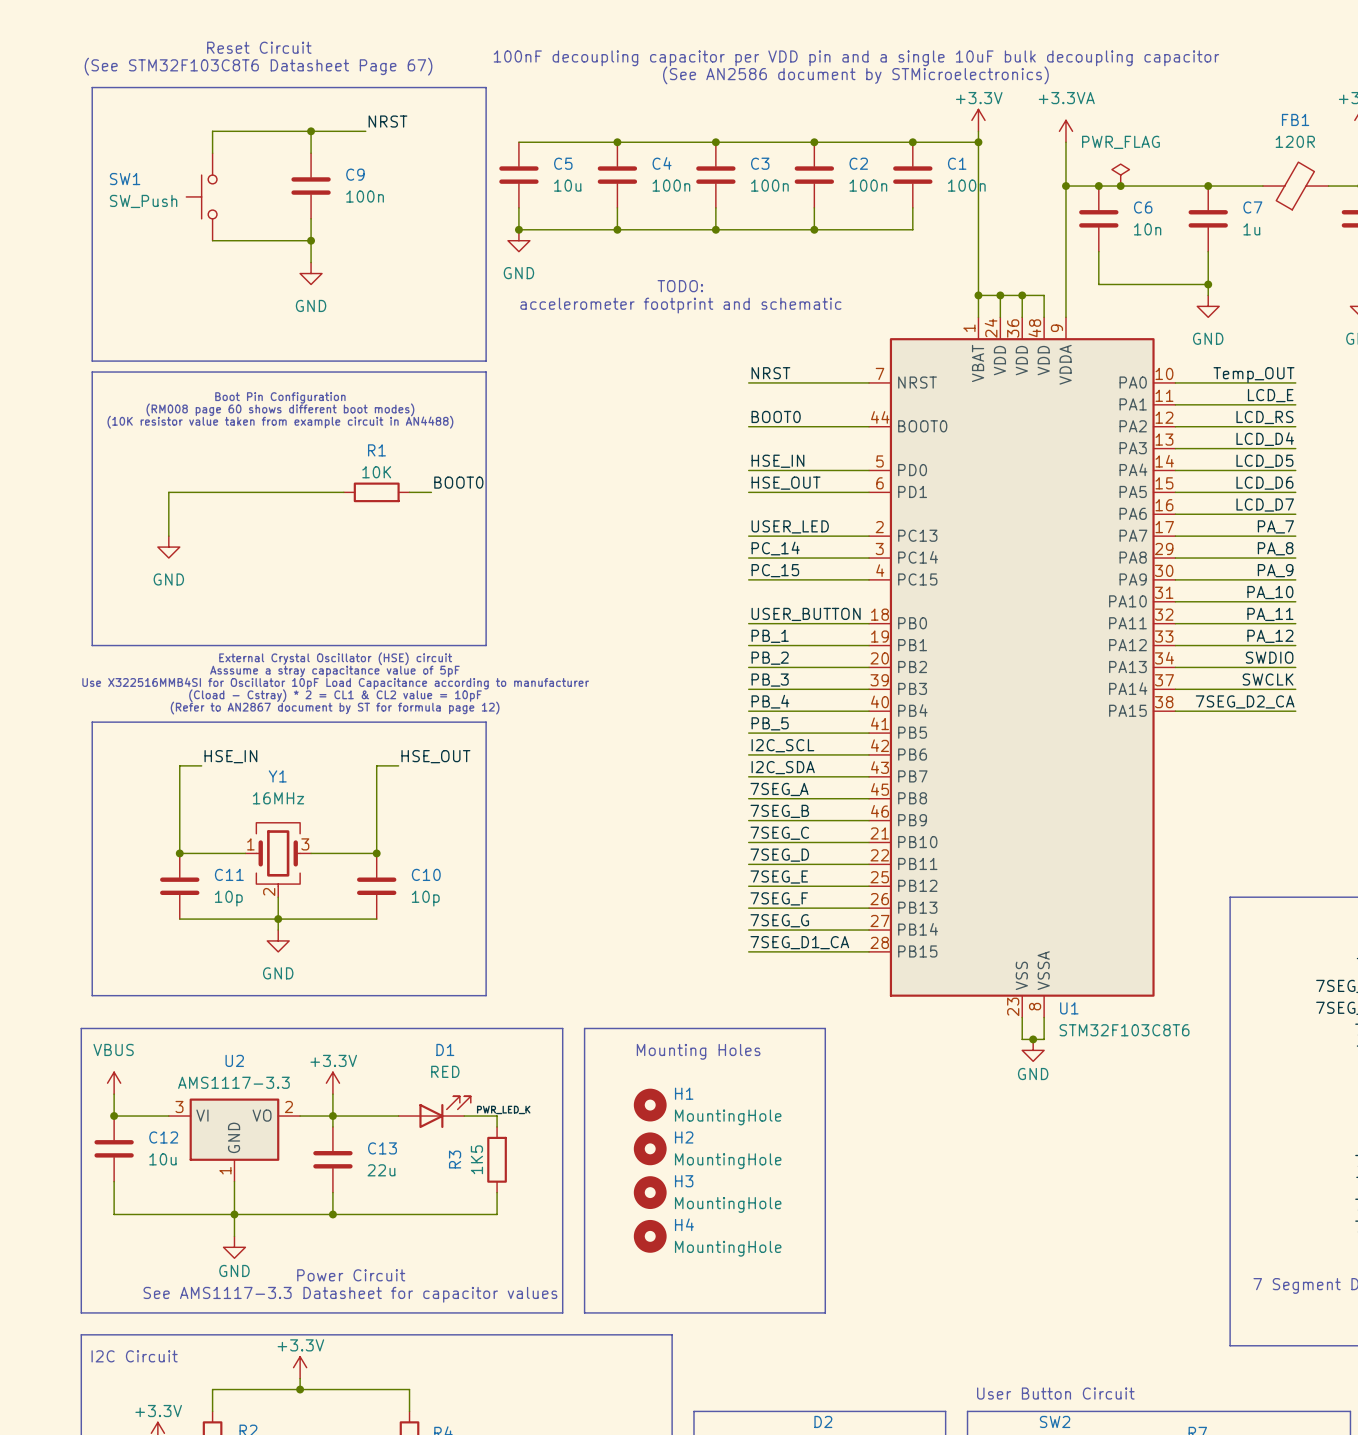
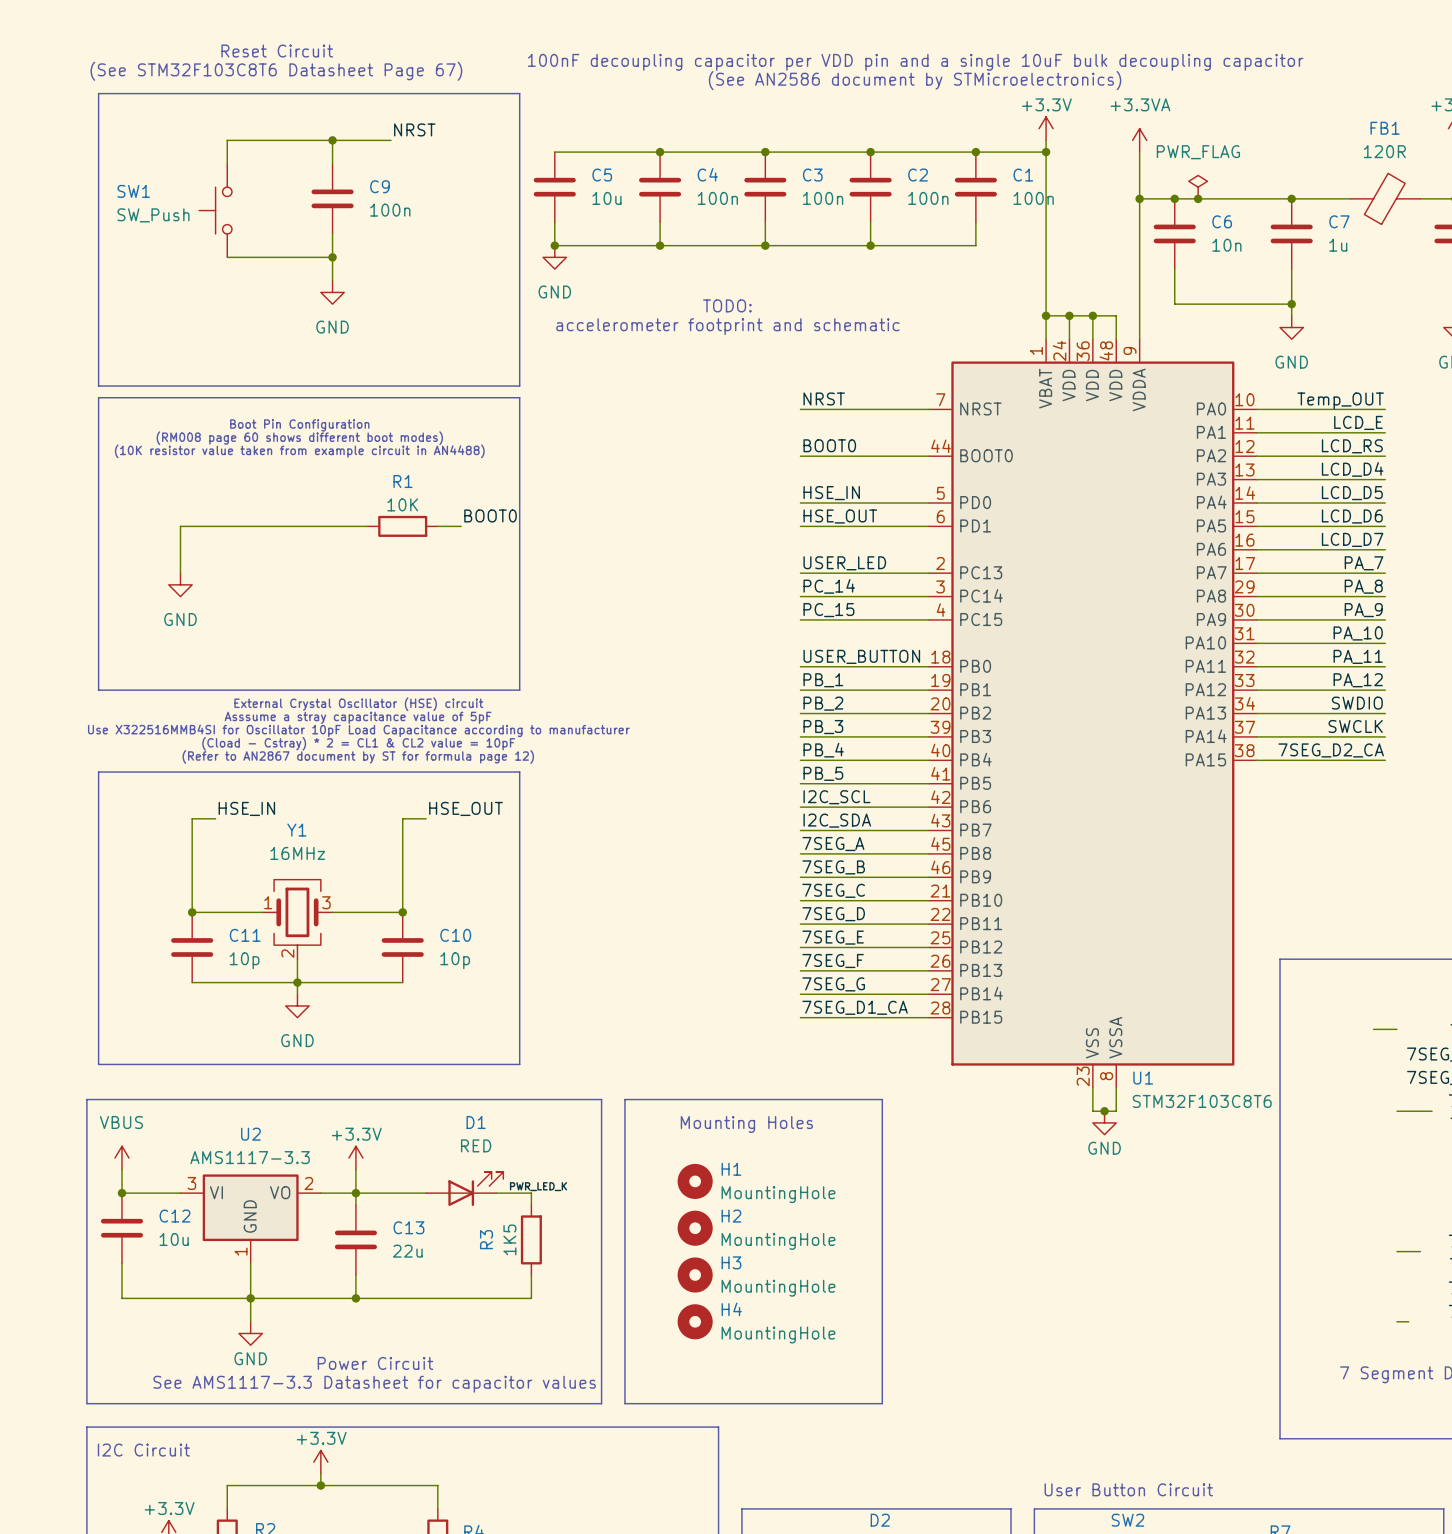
line: (1230, 897) (1230, 1345) -> (1315, 959) (1280, 959) (1280, 1438) (1315, 1438)
wire: none -> (1373, 1029) (1396, 1029)
wire: none -> (1396, 1111) (1432, 1111)
wire: none -> (1396, 1251) (1420, 1251)
wire: none -> (1396, 1321) (1408, 1321)

